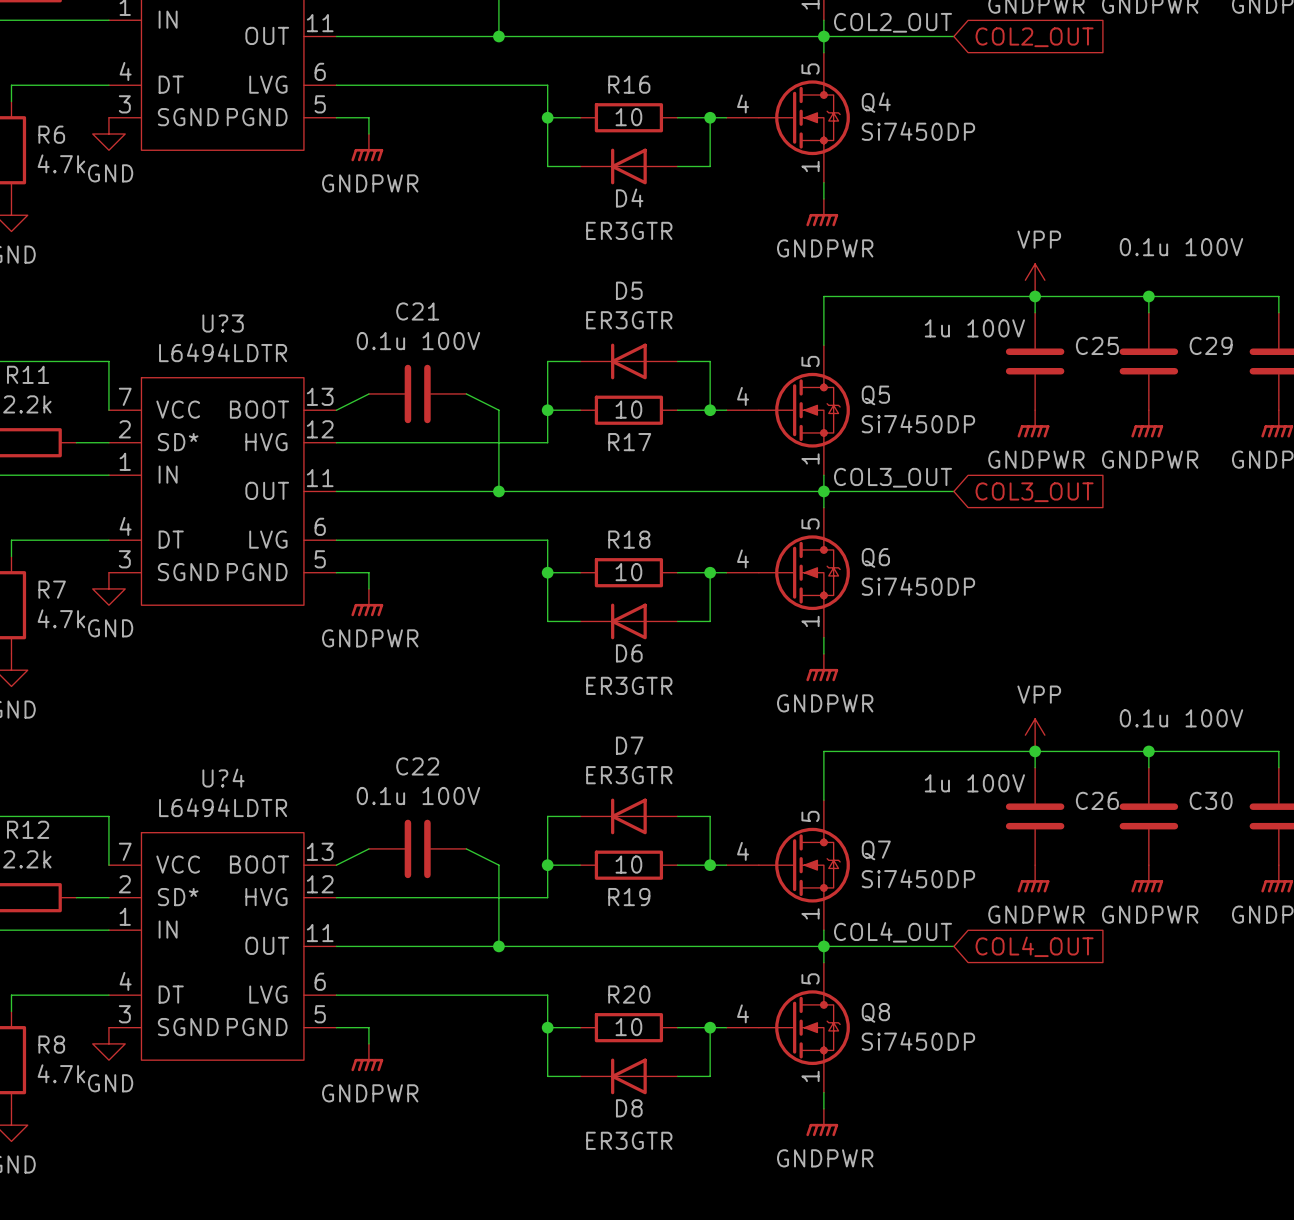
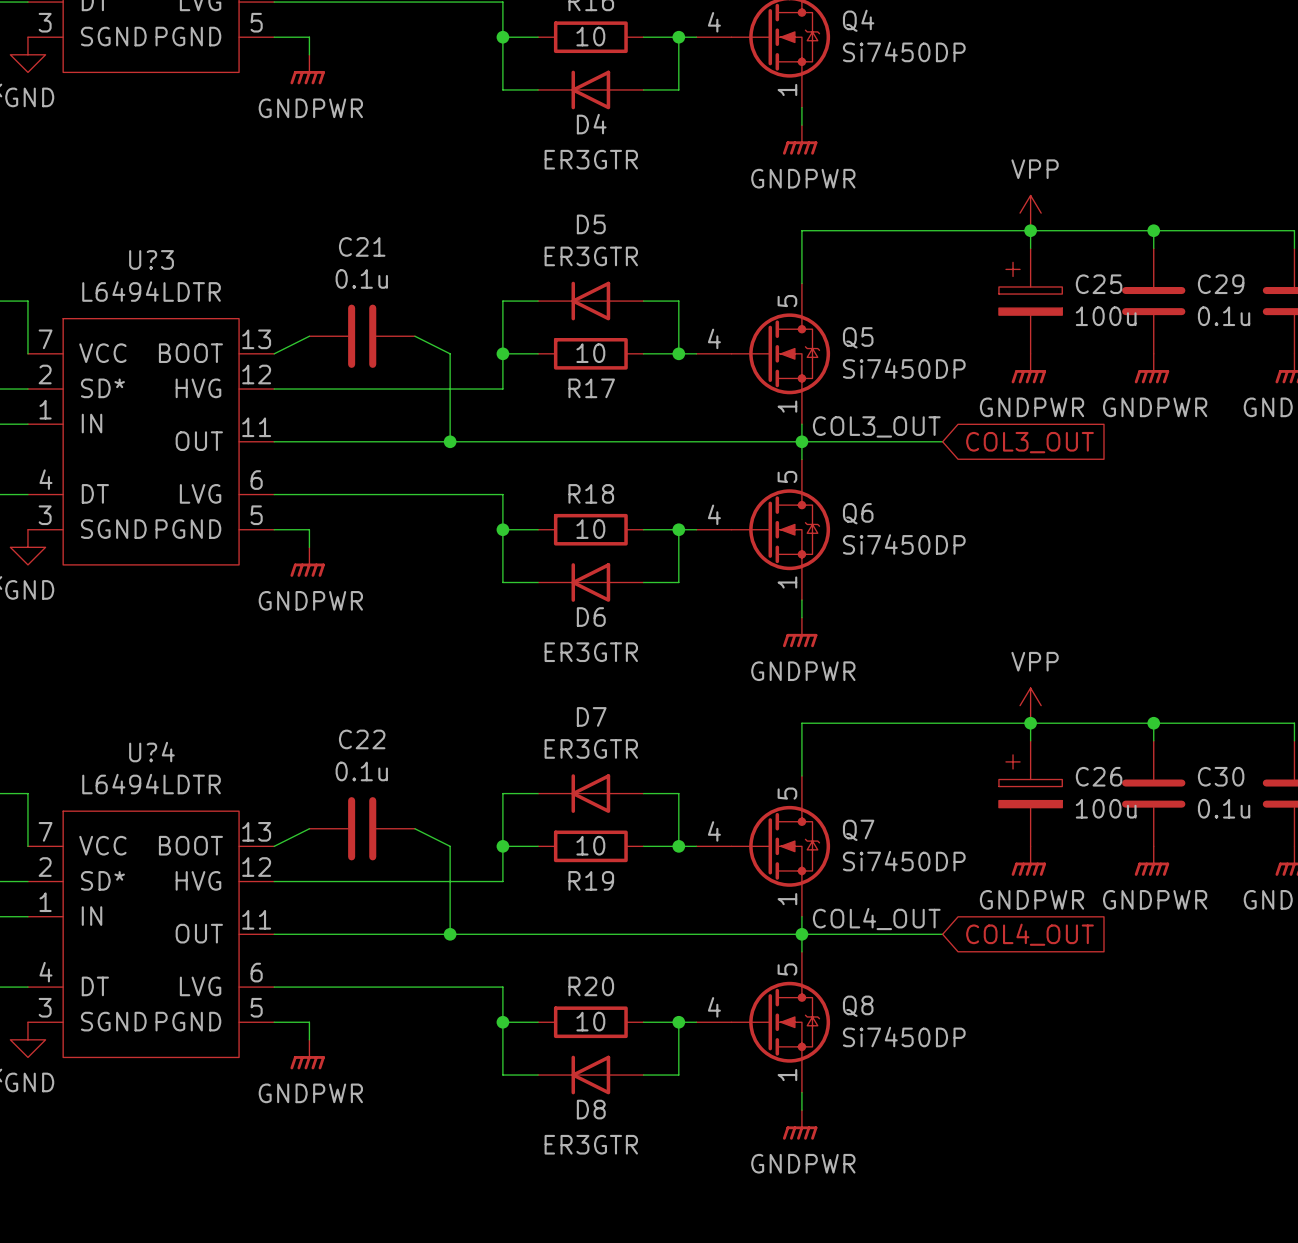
C29 value: 0.1u 100V (1181, 247) -> 0.1u (1224, 316)
C25 symbol: [1005, 312, 1065, 411] -> [998, 248, 1063, 354]
C25 value: 1u 100V (974, 328) -> 100u (1106, 316)
C21 value: 0.1u 100V (418, 341) -> 0.1u (361, 278)
C30 value: 0.1u 100V (1181, 718) -> 0.1u (1224, 808)
C26 symbol: [1005, 767, 1065, 866] -> [998, 740, 1063, 847]
C26 value: 1u 100V (974, 783) -> 100u (1106, 808)
C22 value: 0.1u 100V (418, 796) -> 0.1u (361, 771)

